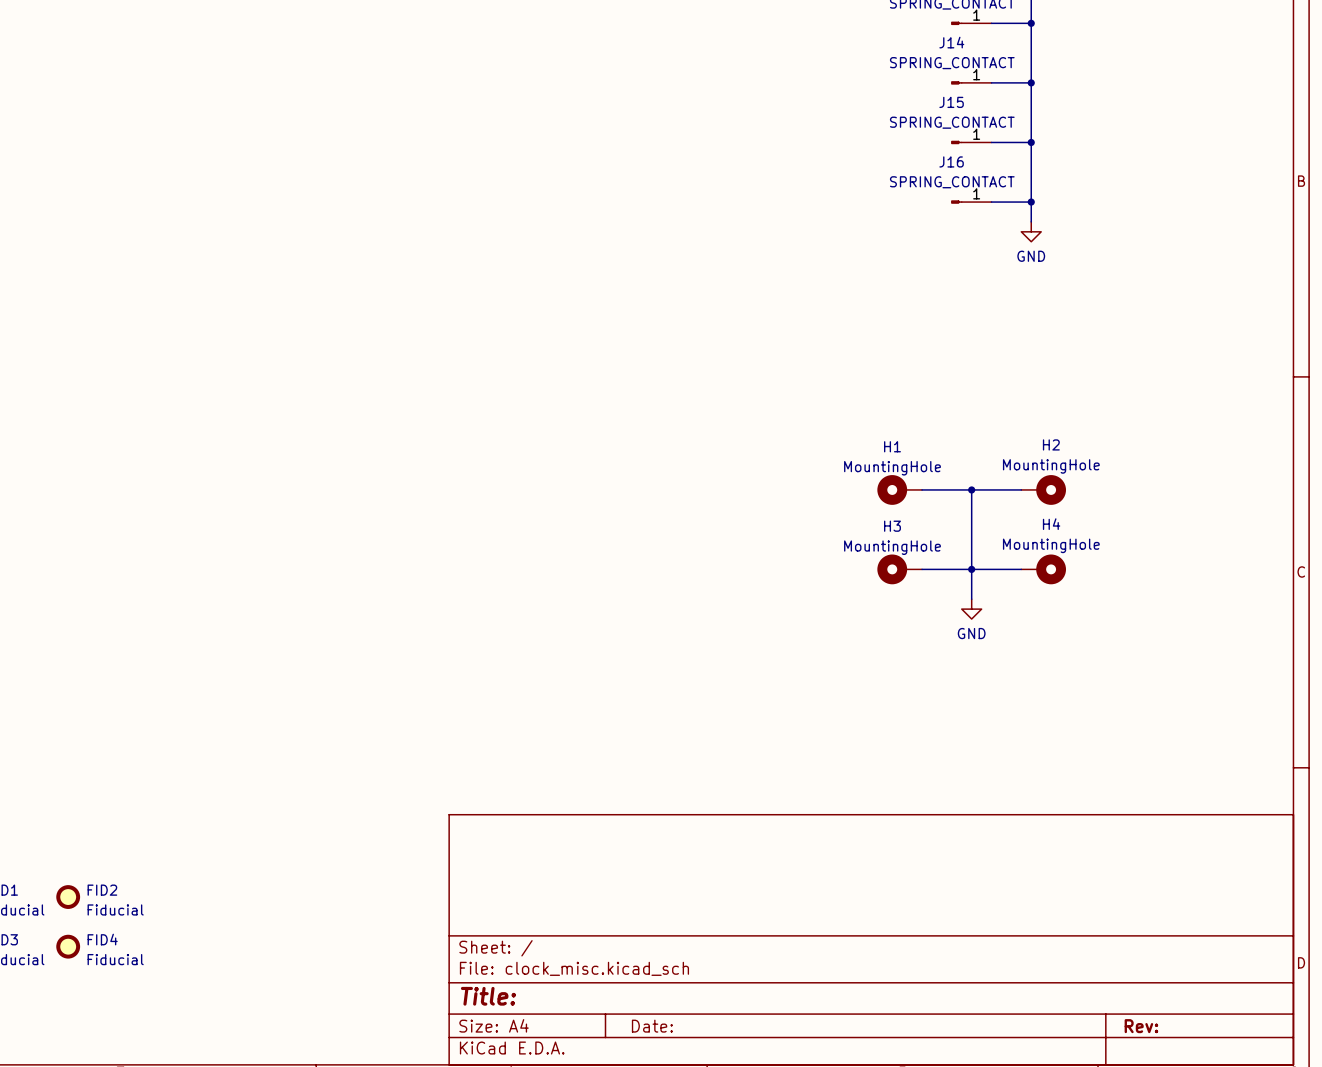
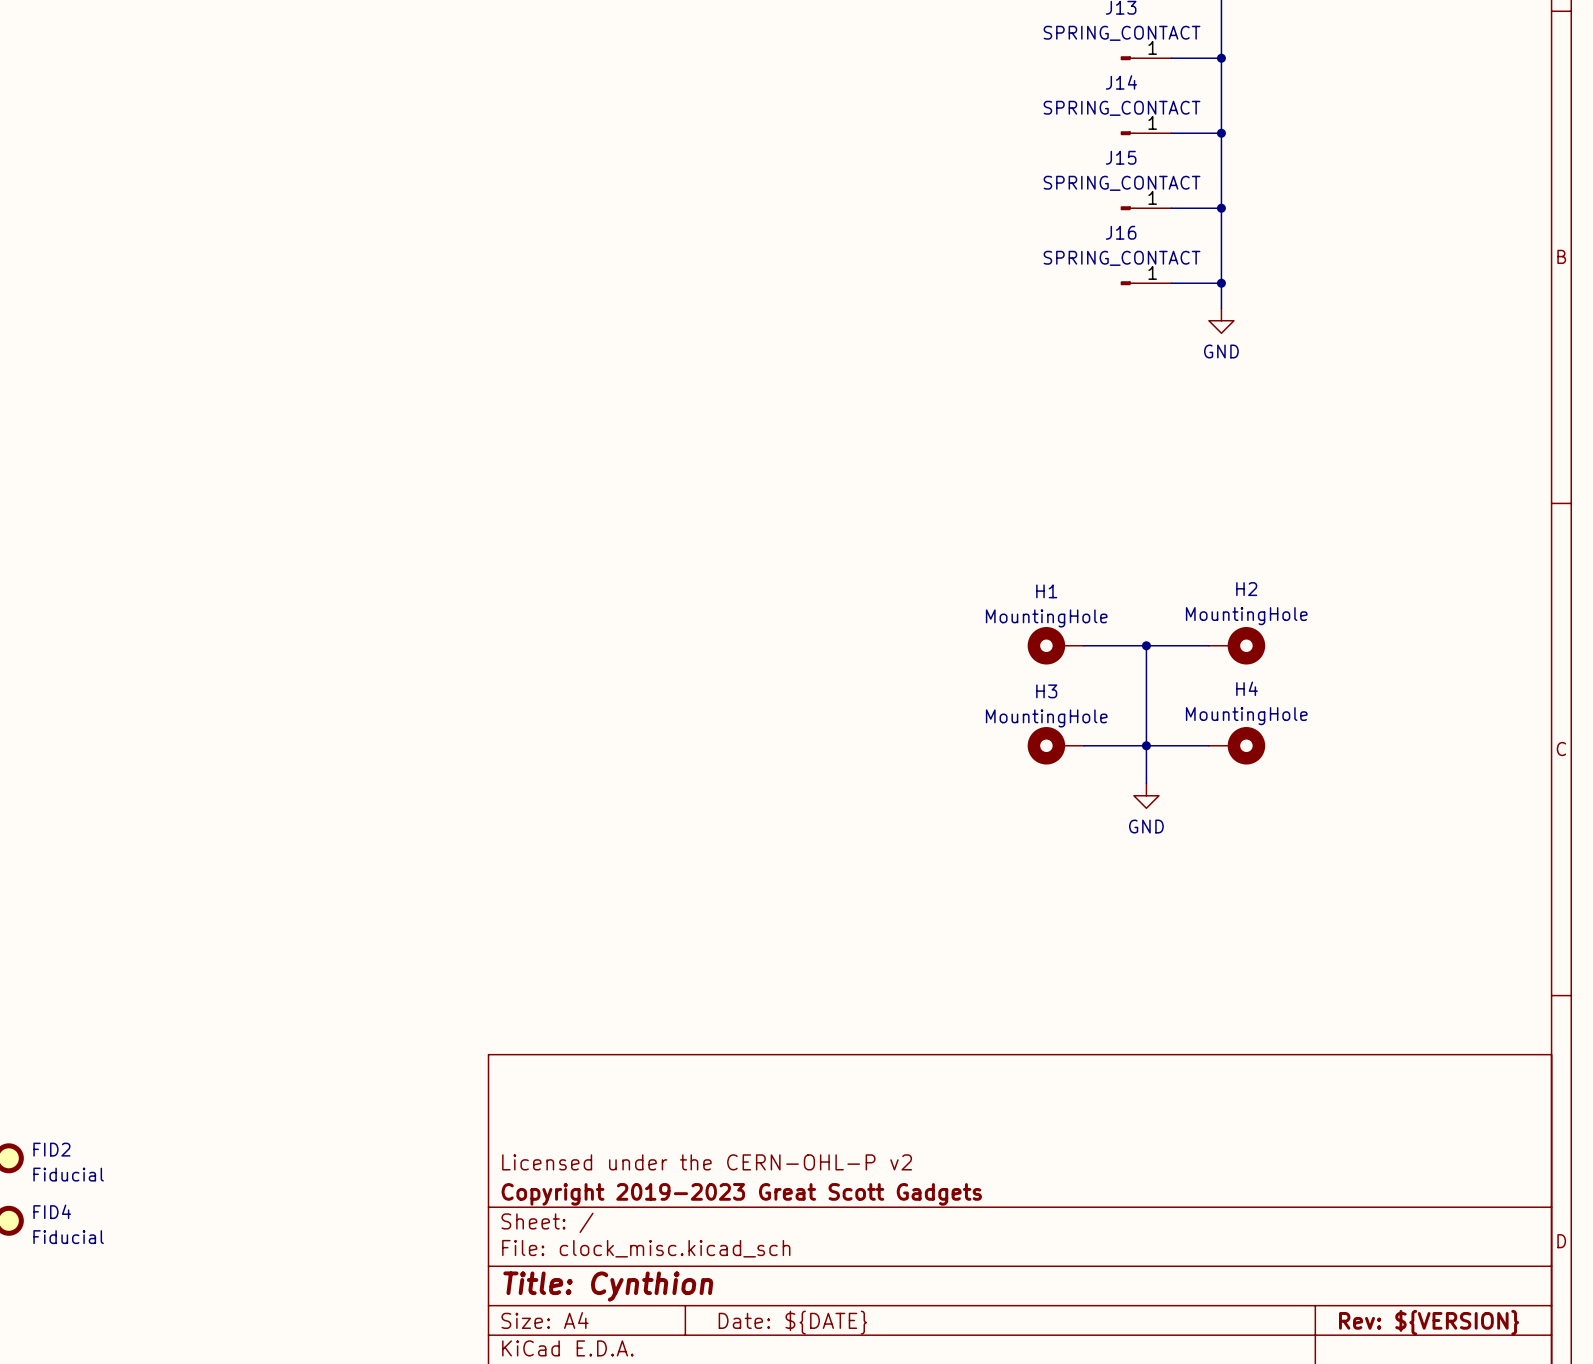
title block: none -> Licensed under the CERN-OHL-P v2 (707, 1162)
title block: none -> Copyright 2019-2023 Great Scott Gadgets (741, 1194)
title block: Title: (488, 996) -> Title: Cynthion (608, 1286)
title block: Date: (652, 1026) -> Date: ${DATE} (792, 1322)
title block: Rev: (1141, 1026) -> Rev: ${VERSION} (1429, 1322)

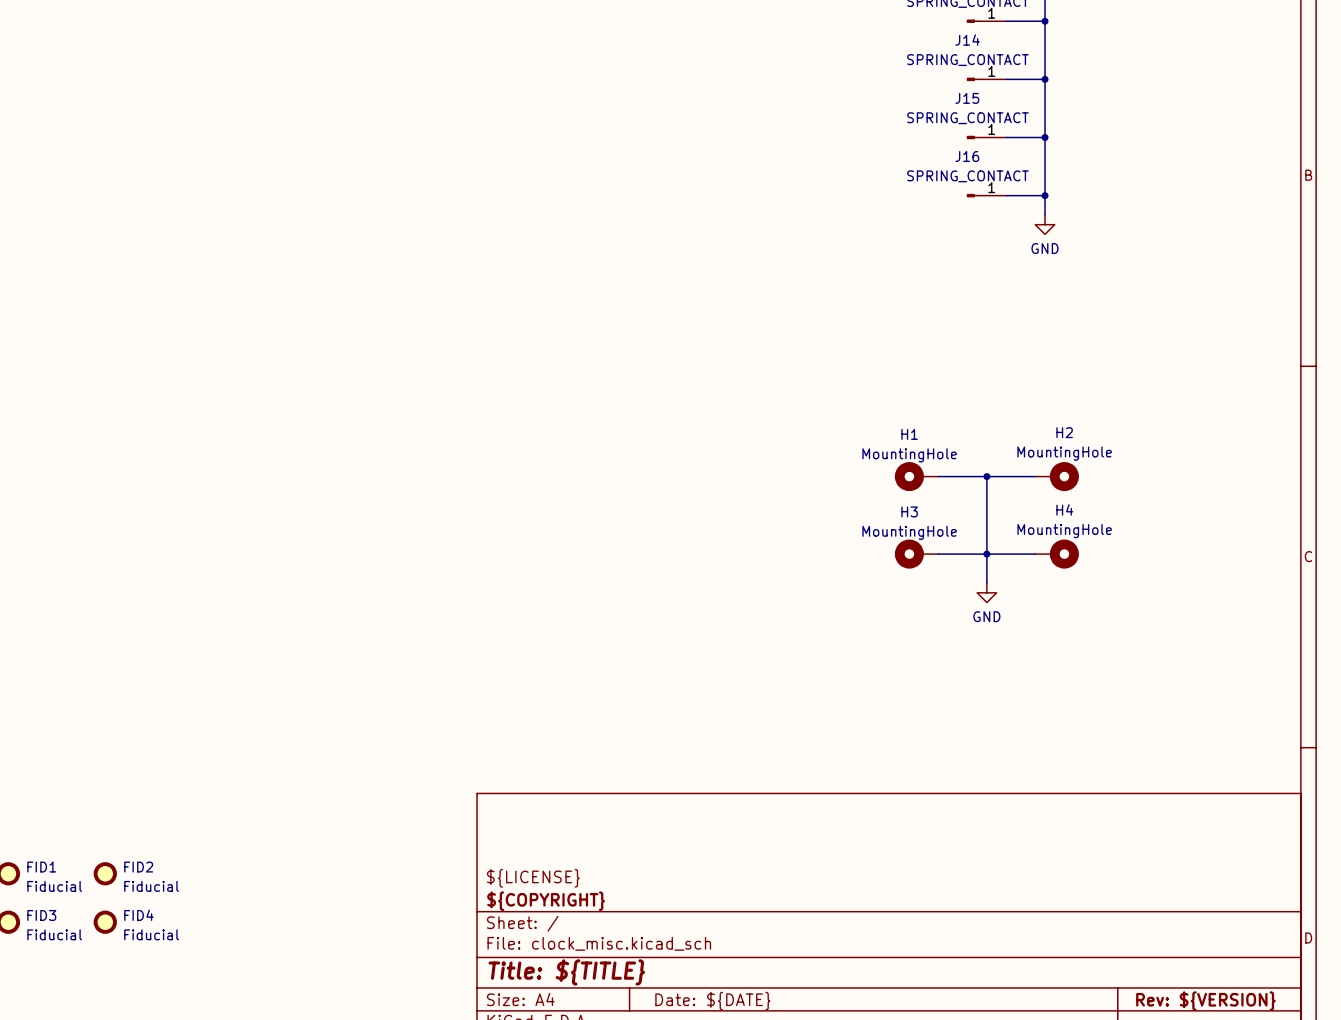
title block: Licensed under the CERN-OHL-P v2 (707, 1162) -> ${LICENSE} (533, 878)
title block: Copyright 2019-2023 Great Scott Gadgets (741, 1194) -> ${COPYRIGHT} (546, 901)
title block: Title: Cynthion (608, 1286) -> Title: ${TITLE} (566, 972)

